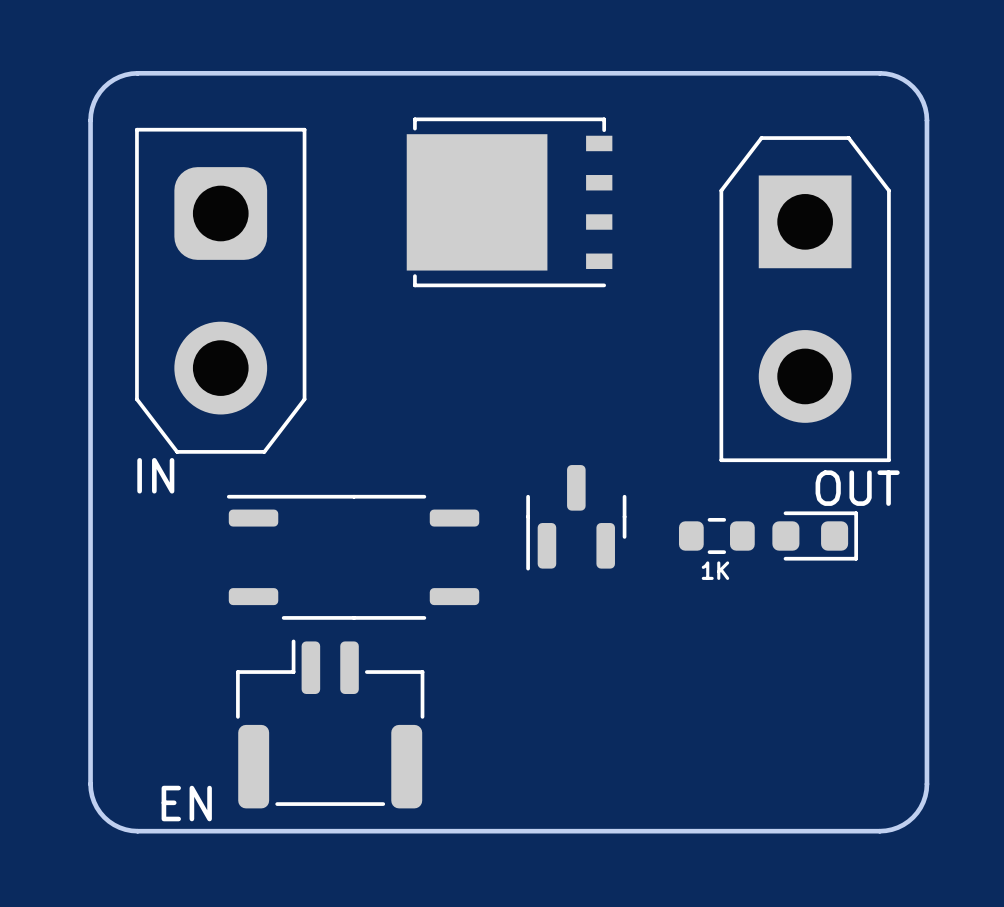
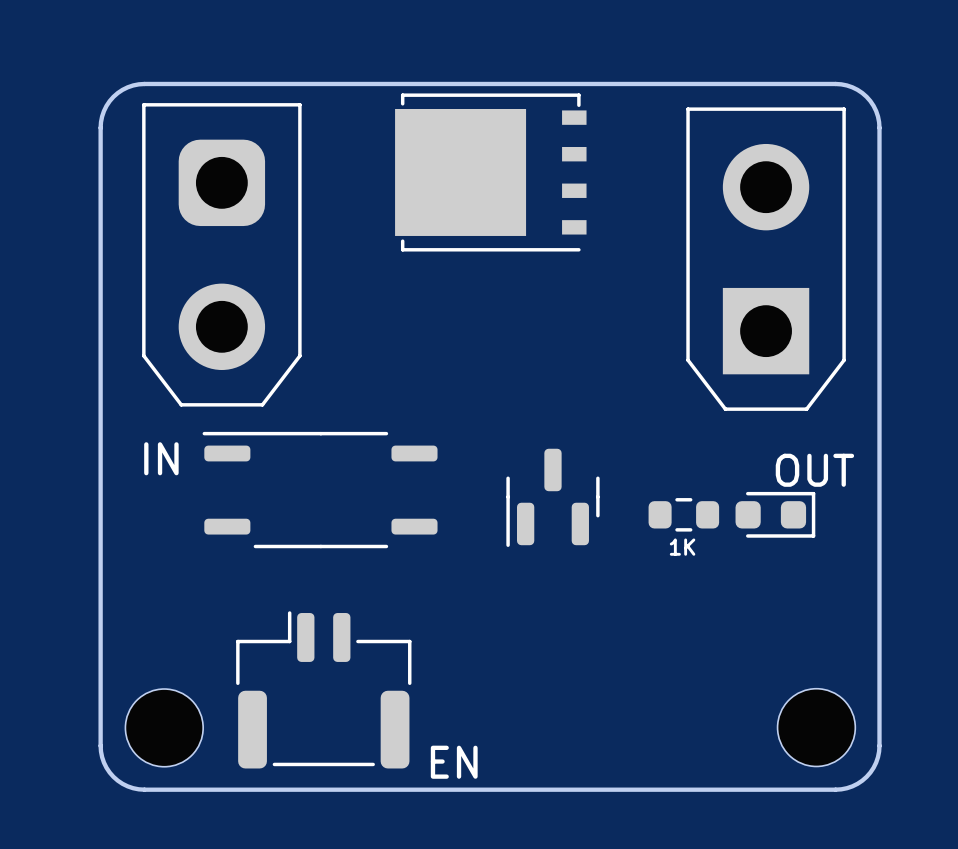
part position: (509, 202) -> (490, 172)
part position: (220, 290) -> (221, 254)
part rotation: 0° (805, 299) -> 180° (766, 259)
part position: (353, 557) -> (320, 490)
part: none -> (164, 727)
part: none -> (816, 727)
text position: EN (186, 803) -> EN (454, 762)

